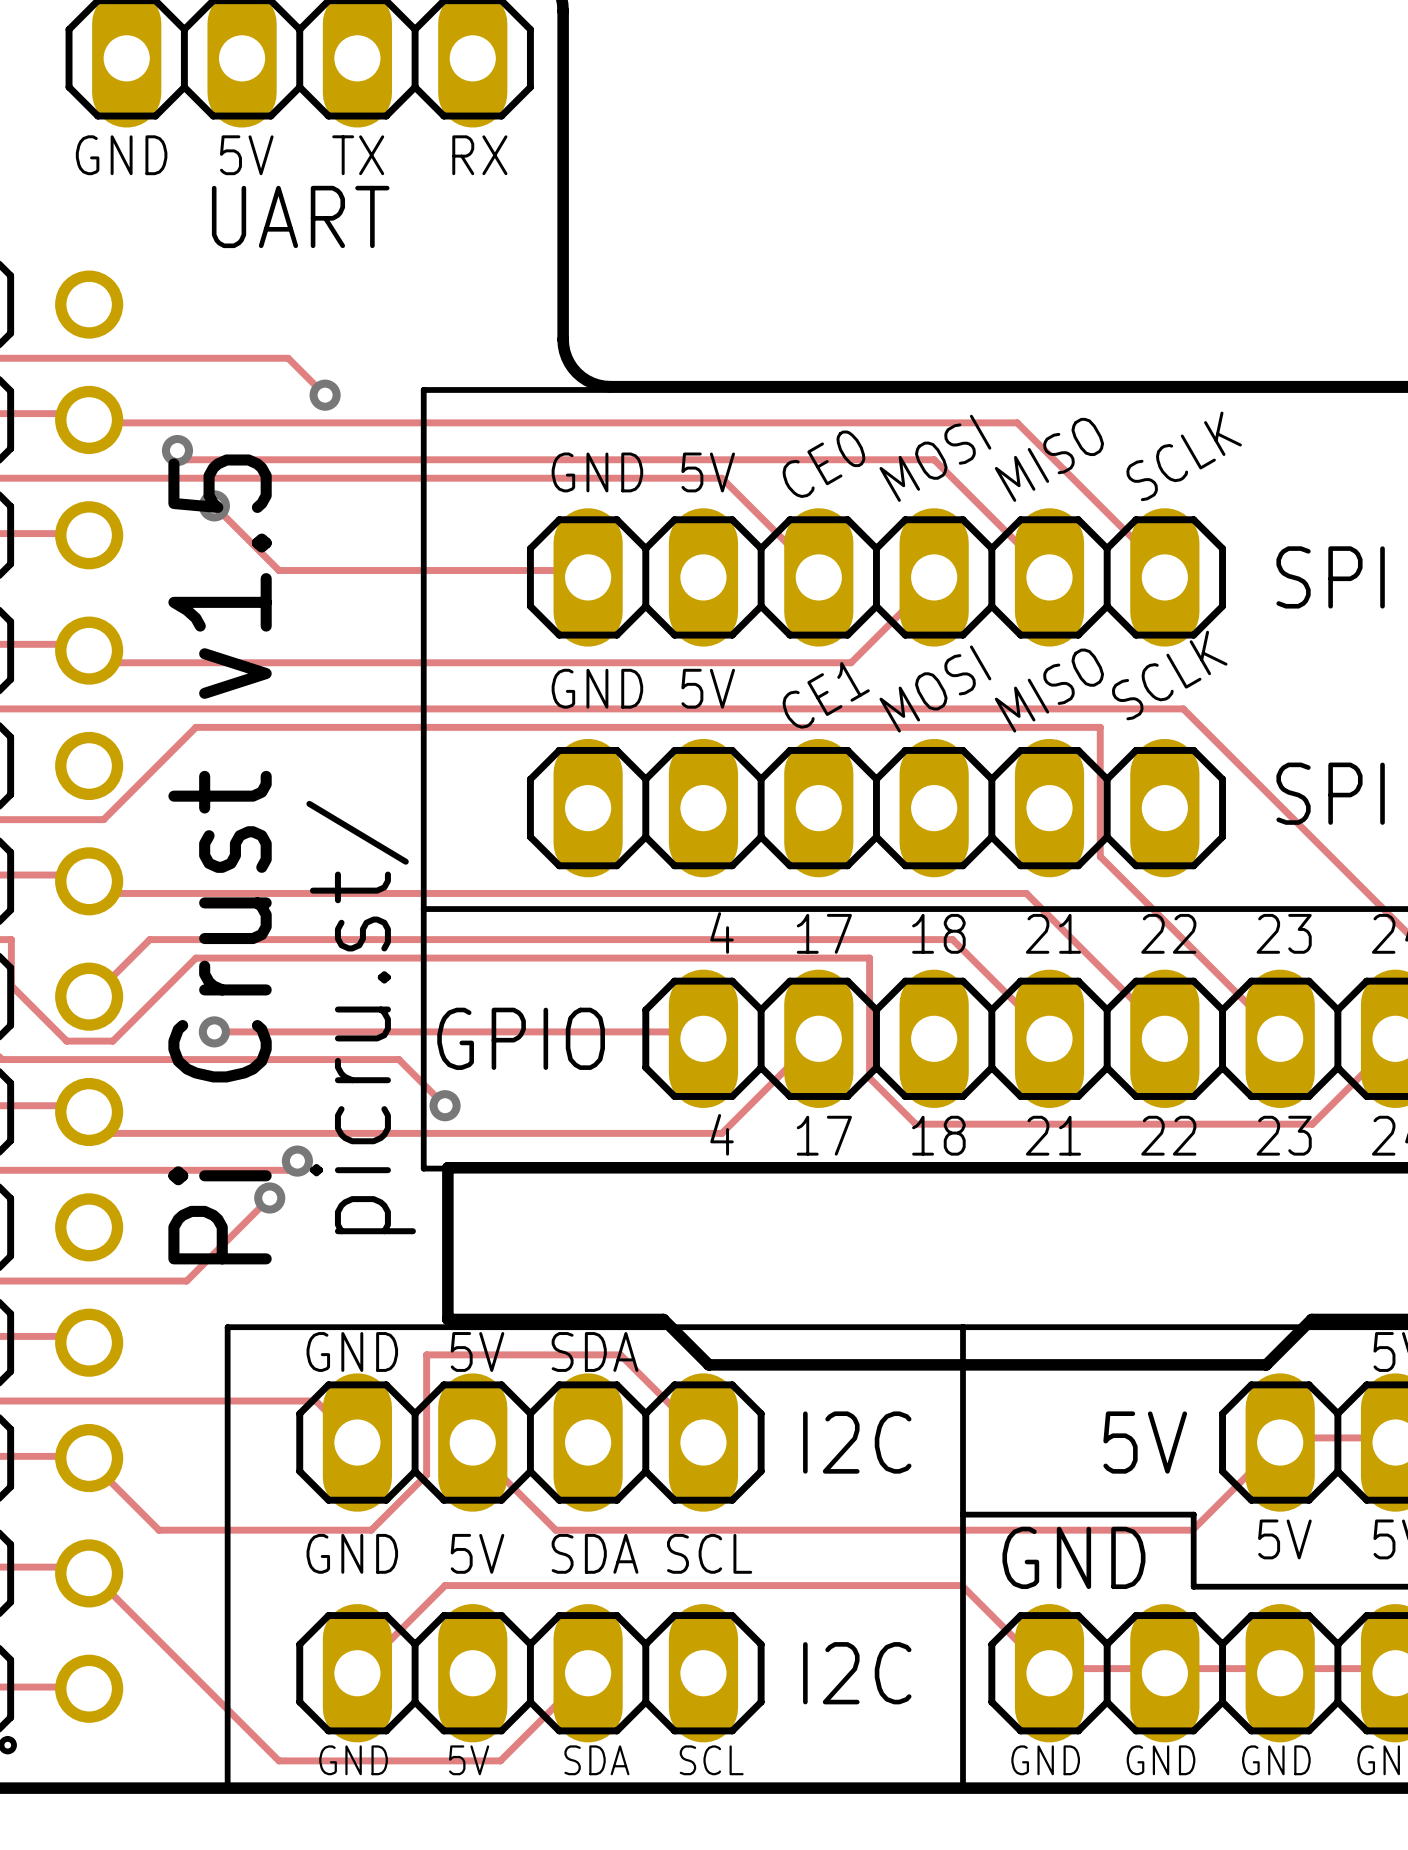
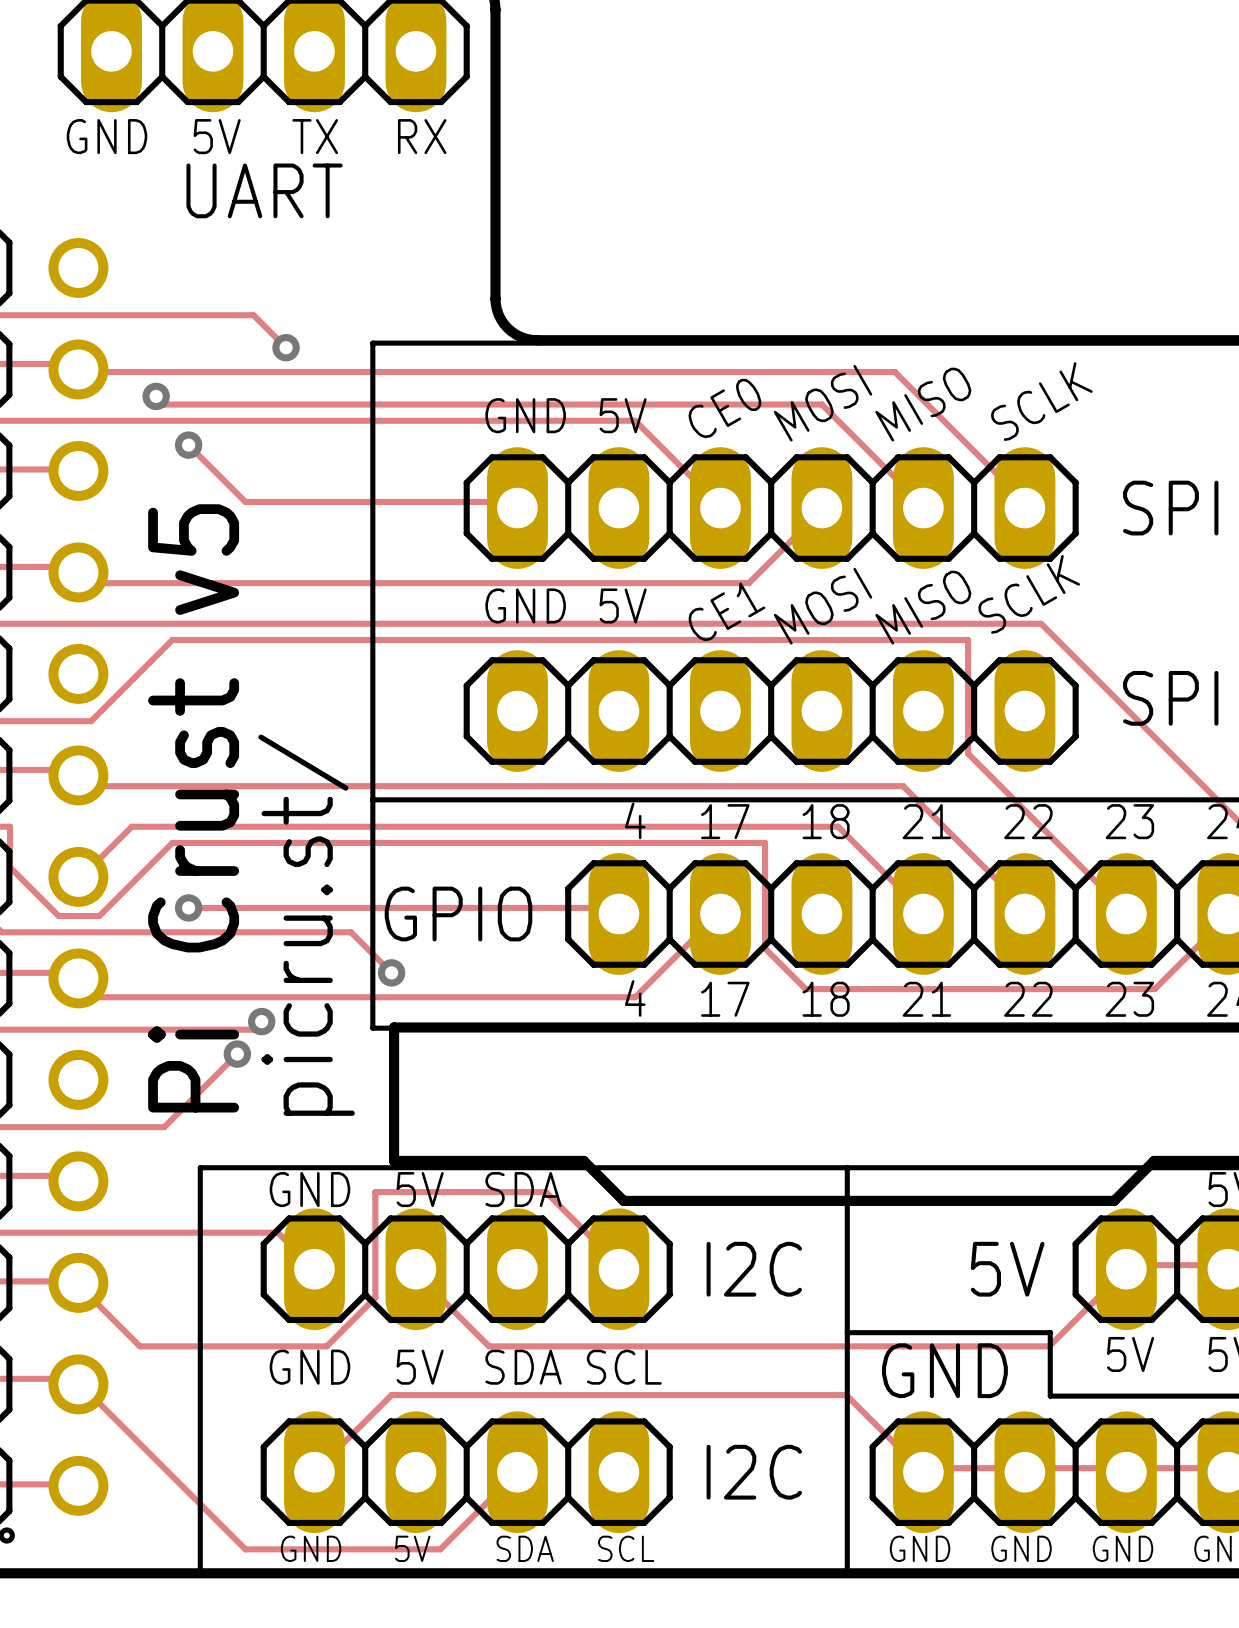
text: Pi Crust v1.5 (220, 859) -> Pi Crust v5 (193, 808)
text position: picru.st/ (361, 1017) -> picru.st/ (306, 925)

